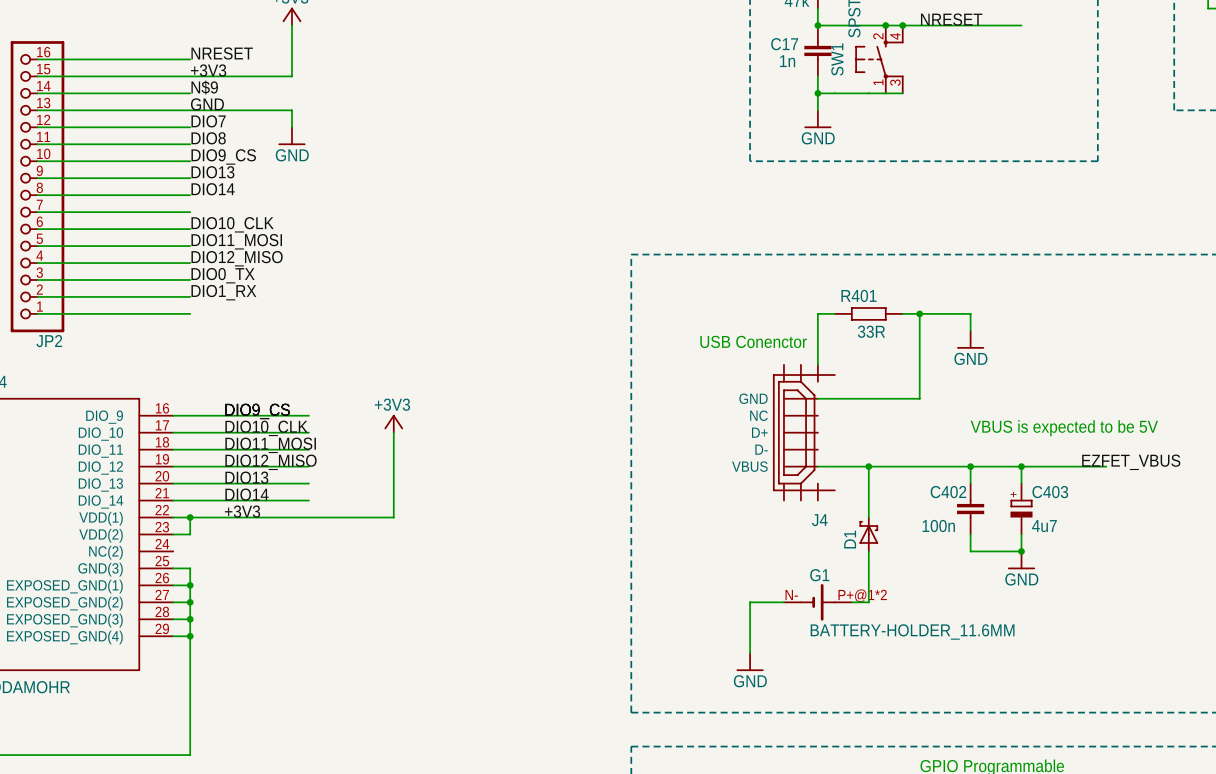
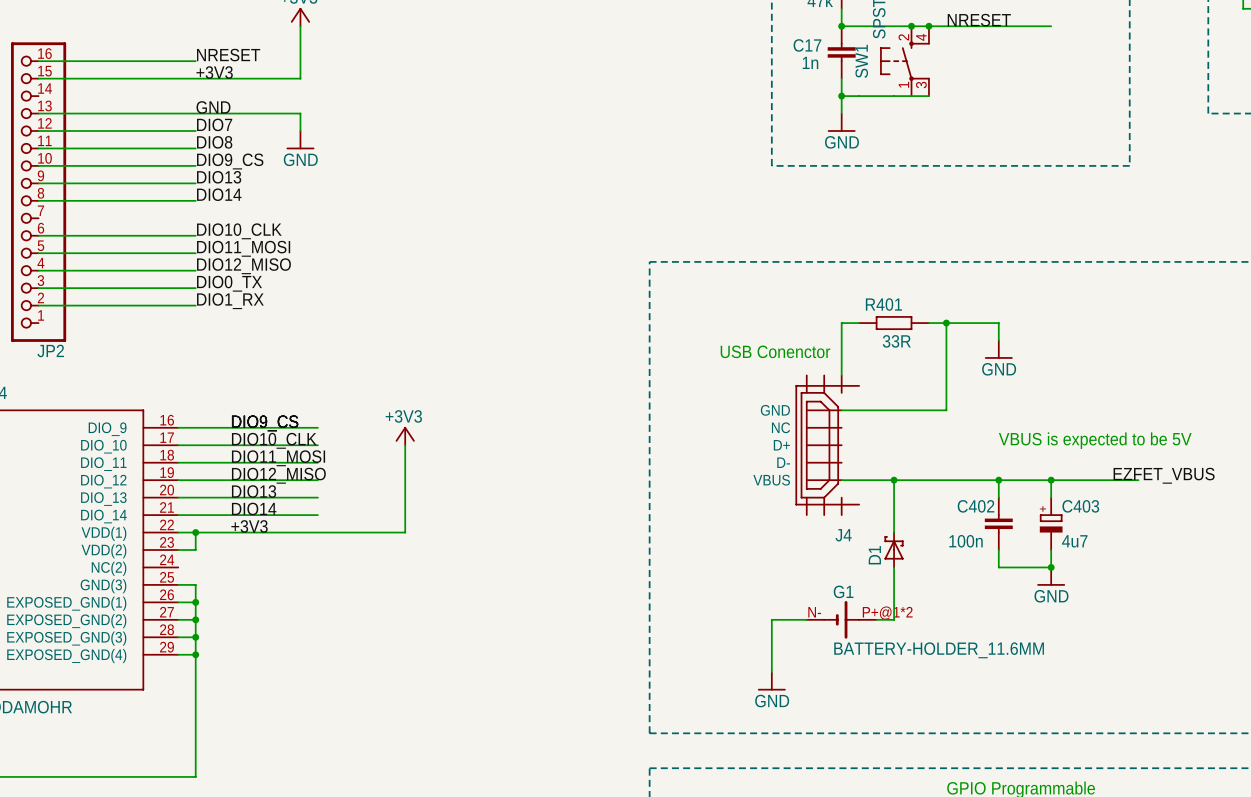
label: N$9 (204, 87) -> none
wire: (37, 93) (190, 93) -> none
wire: (37, 212) (190, 212) -> none
wire: (37, 313) (190, 313) -> none

